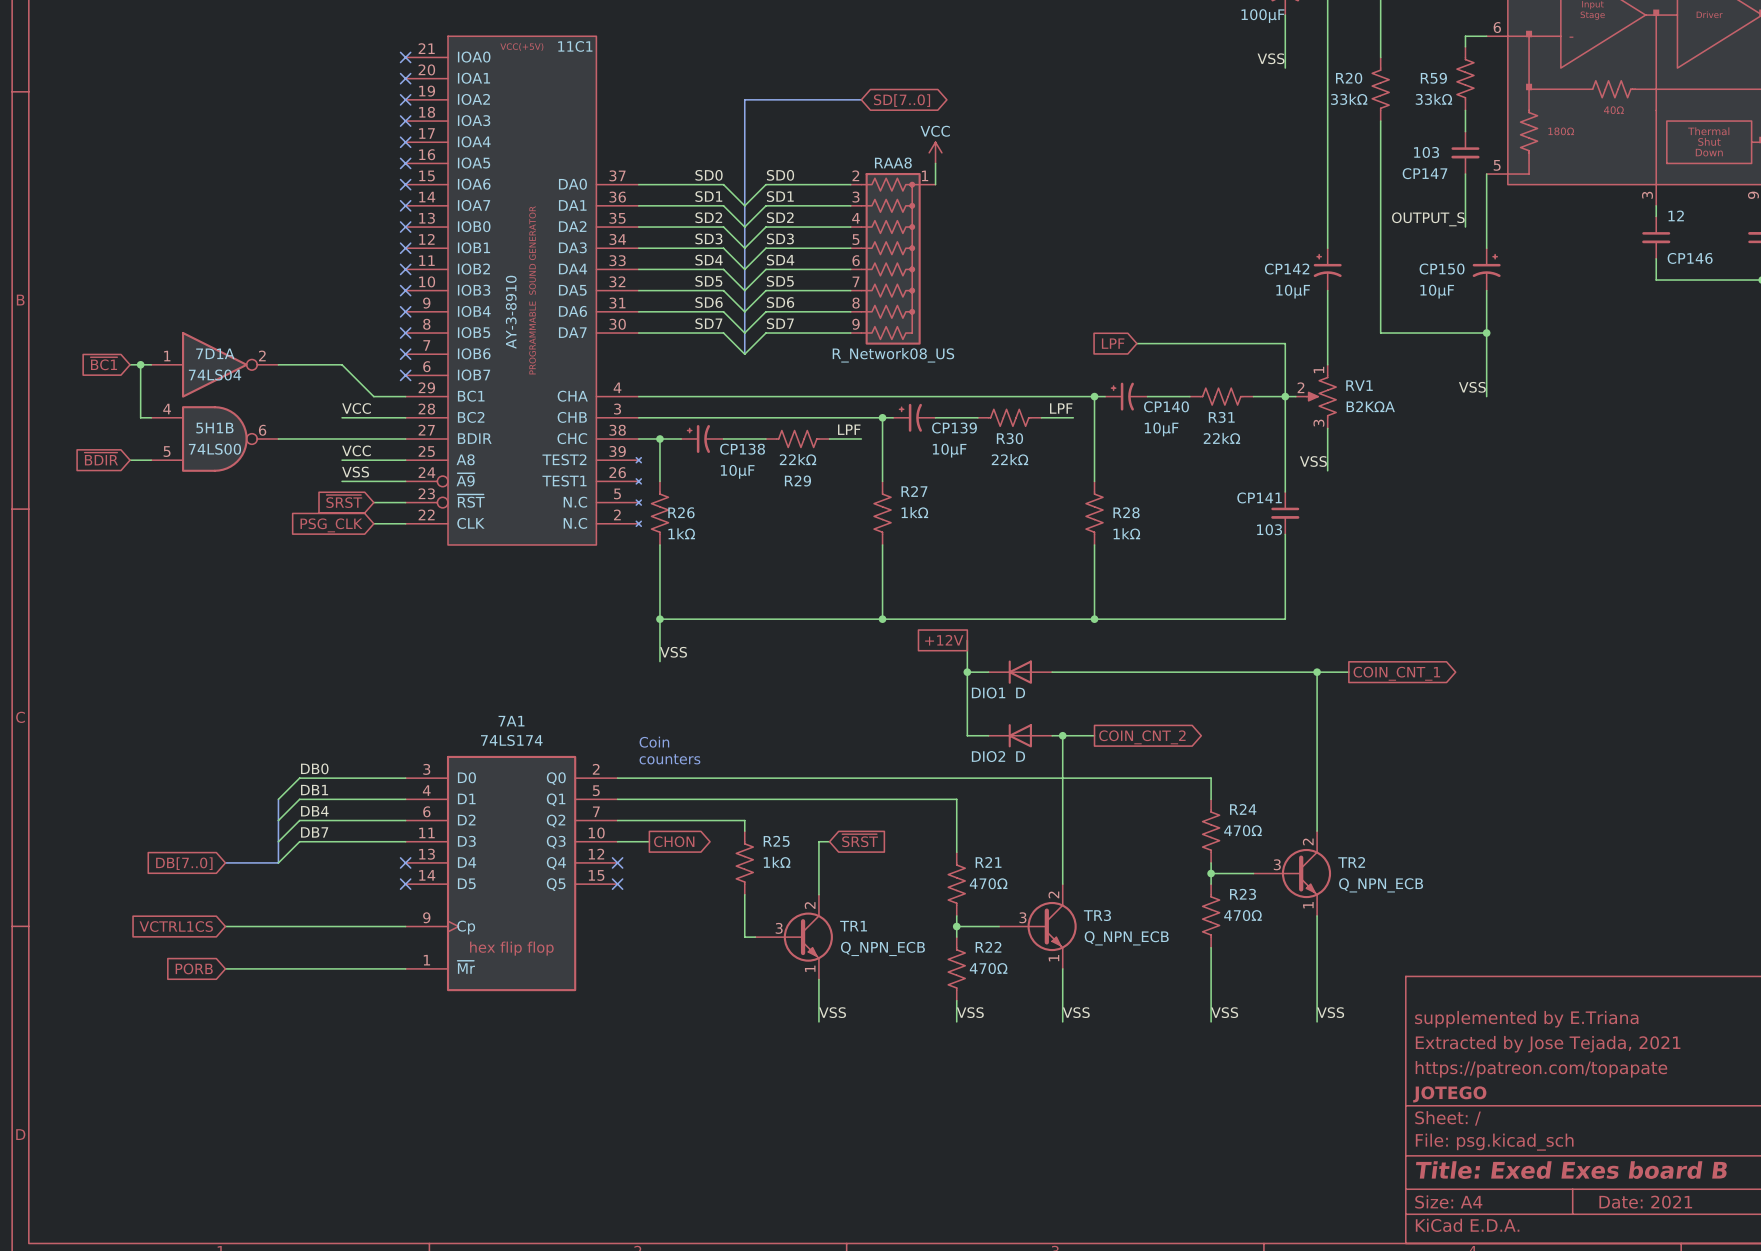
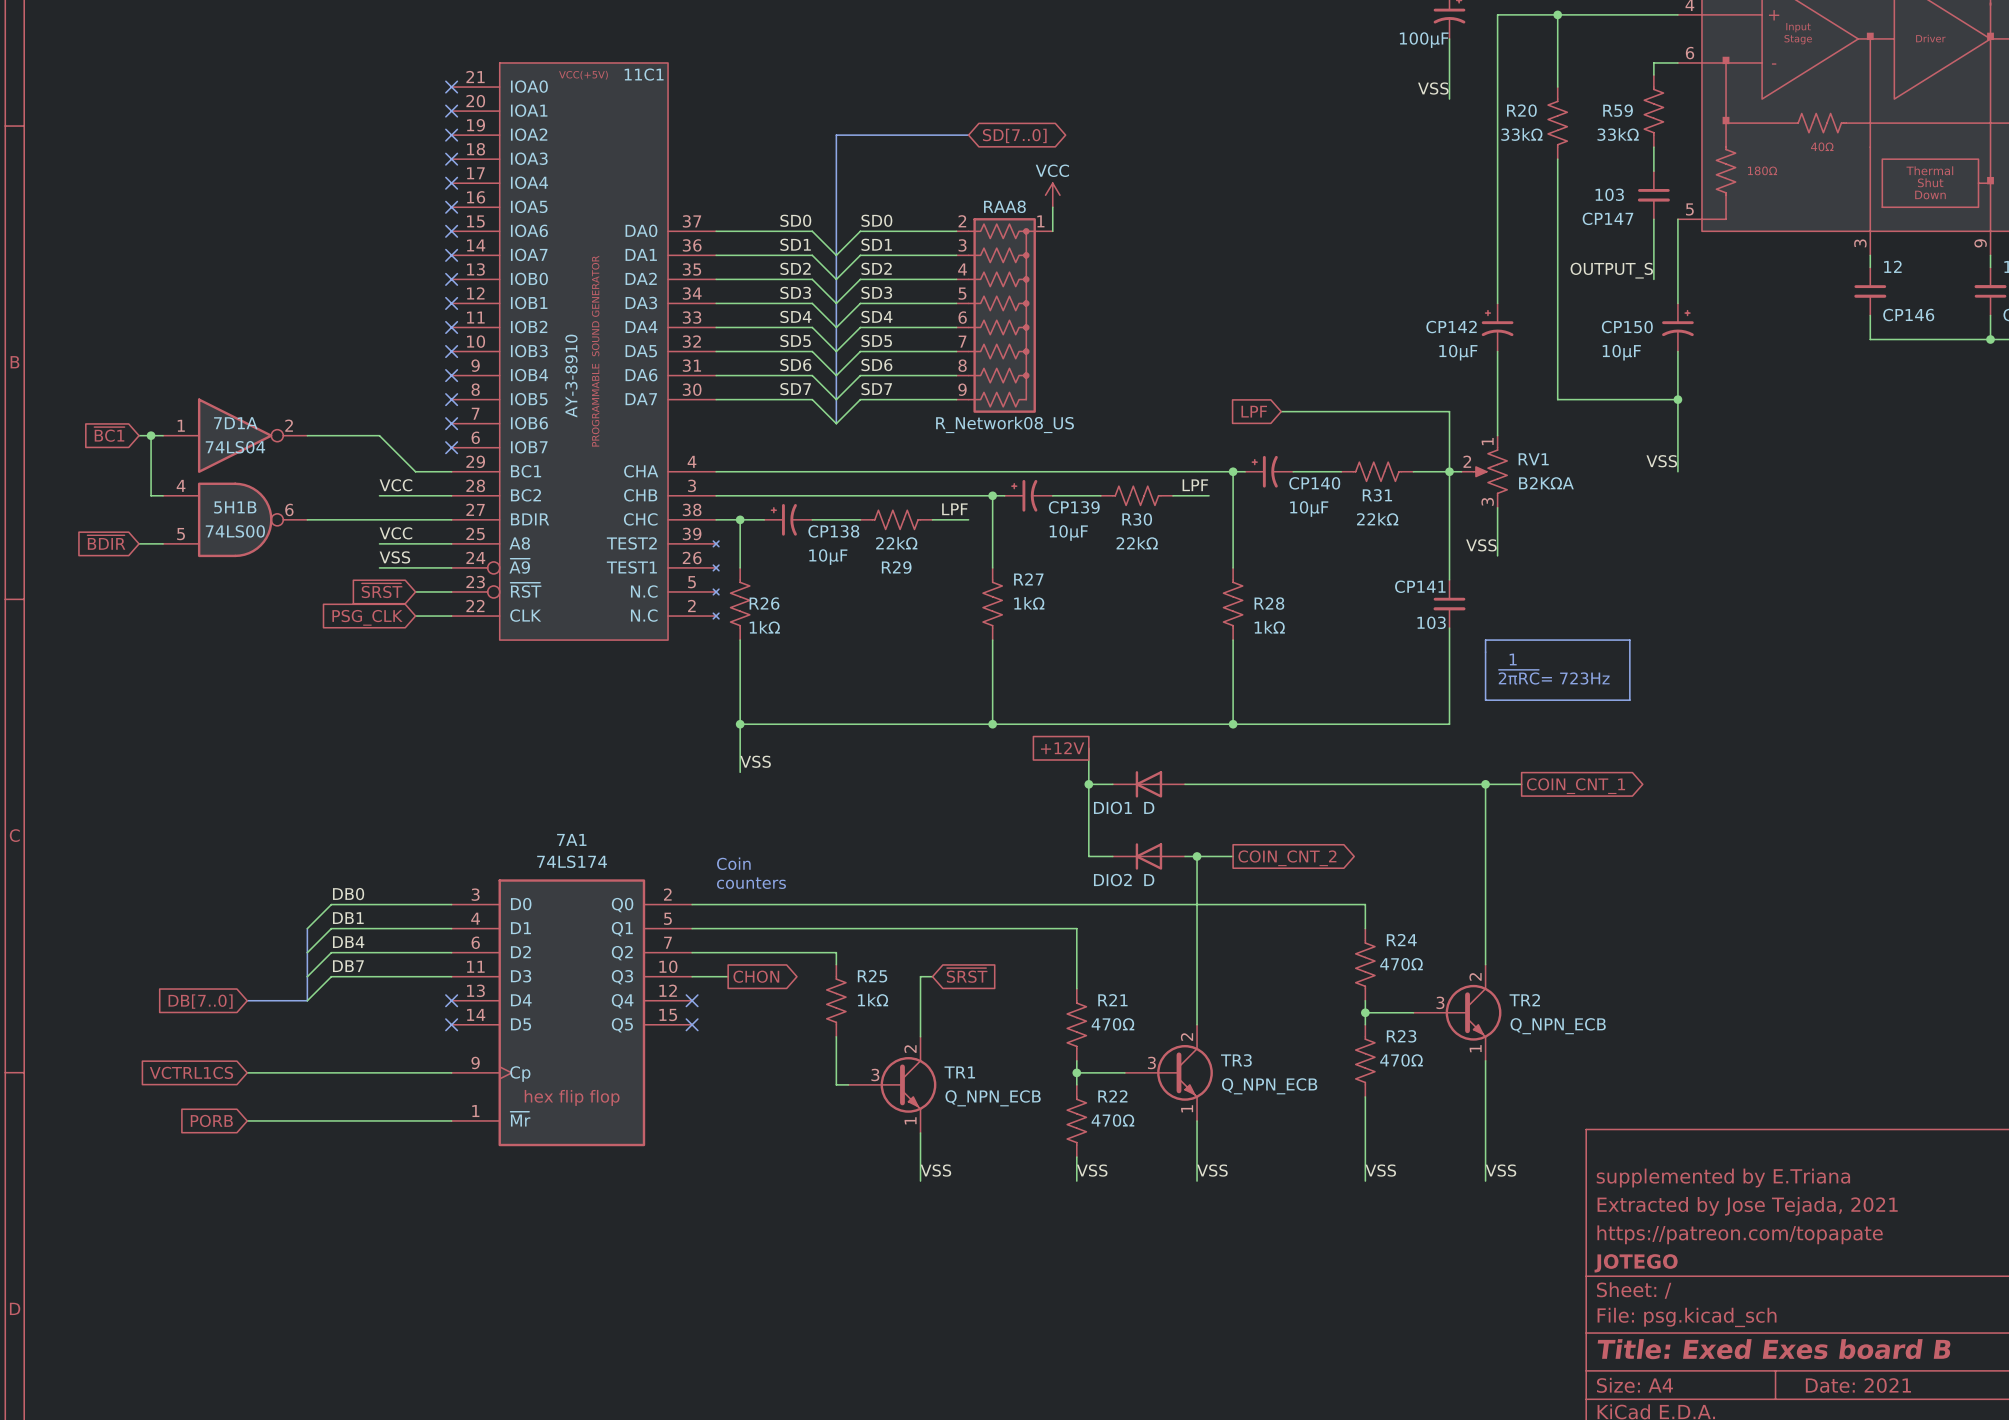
line: none -> (1485, 640) (1485, 700) (1629, 700) (1629, 640) (1485, 640)
text: none -> 1 (1513, 659)
text: none -> ~{2πRC}= 723Hz (1554, 677)

